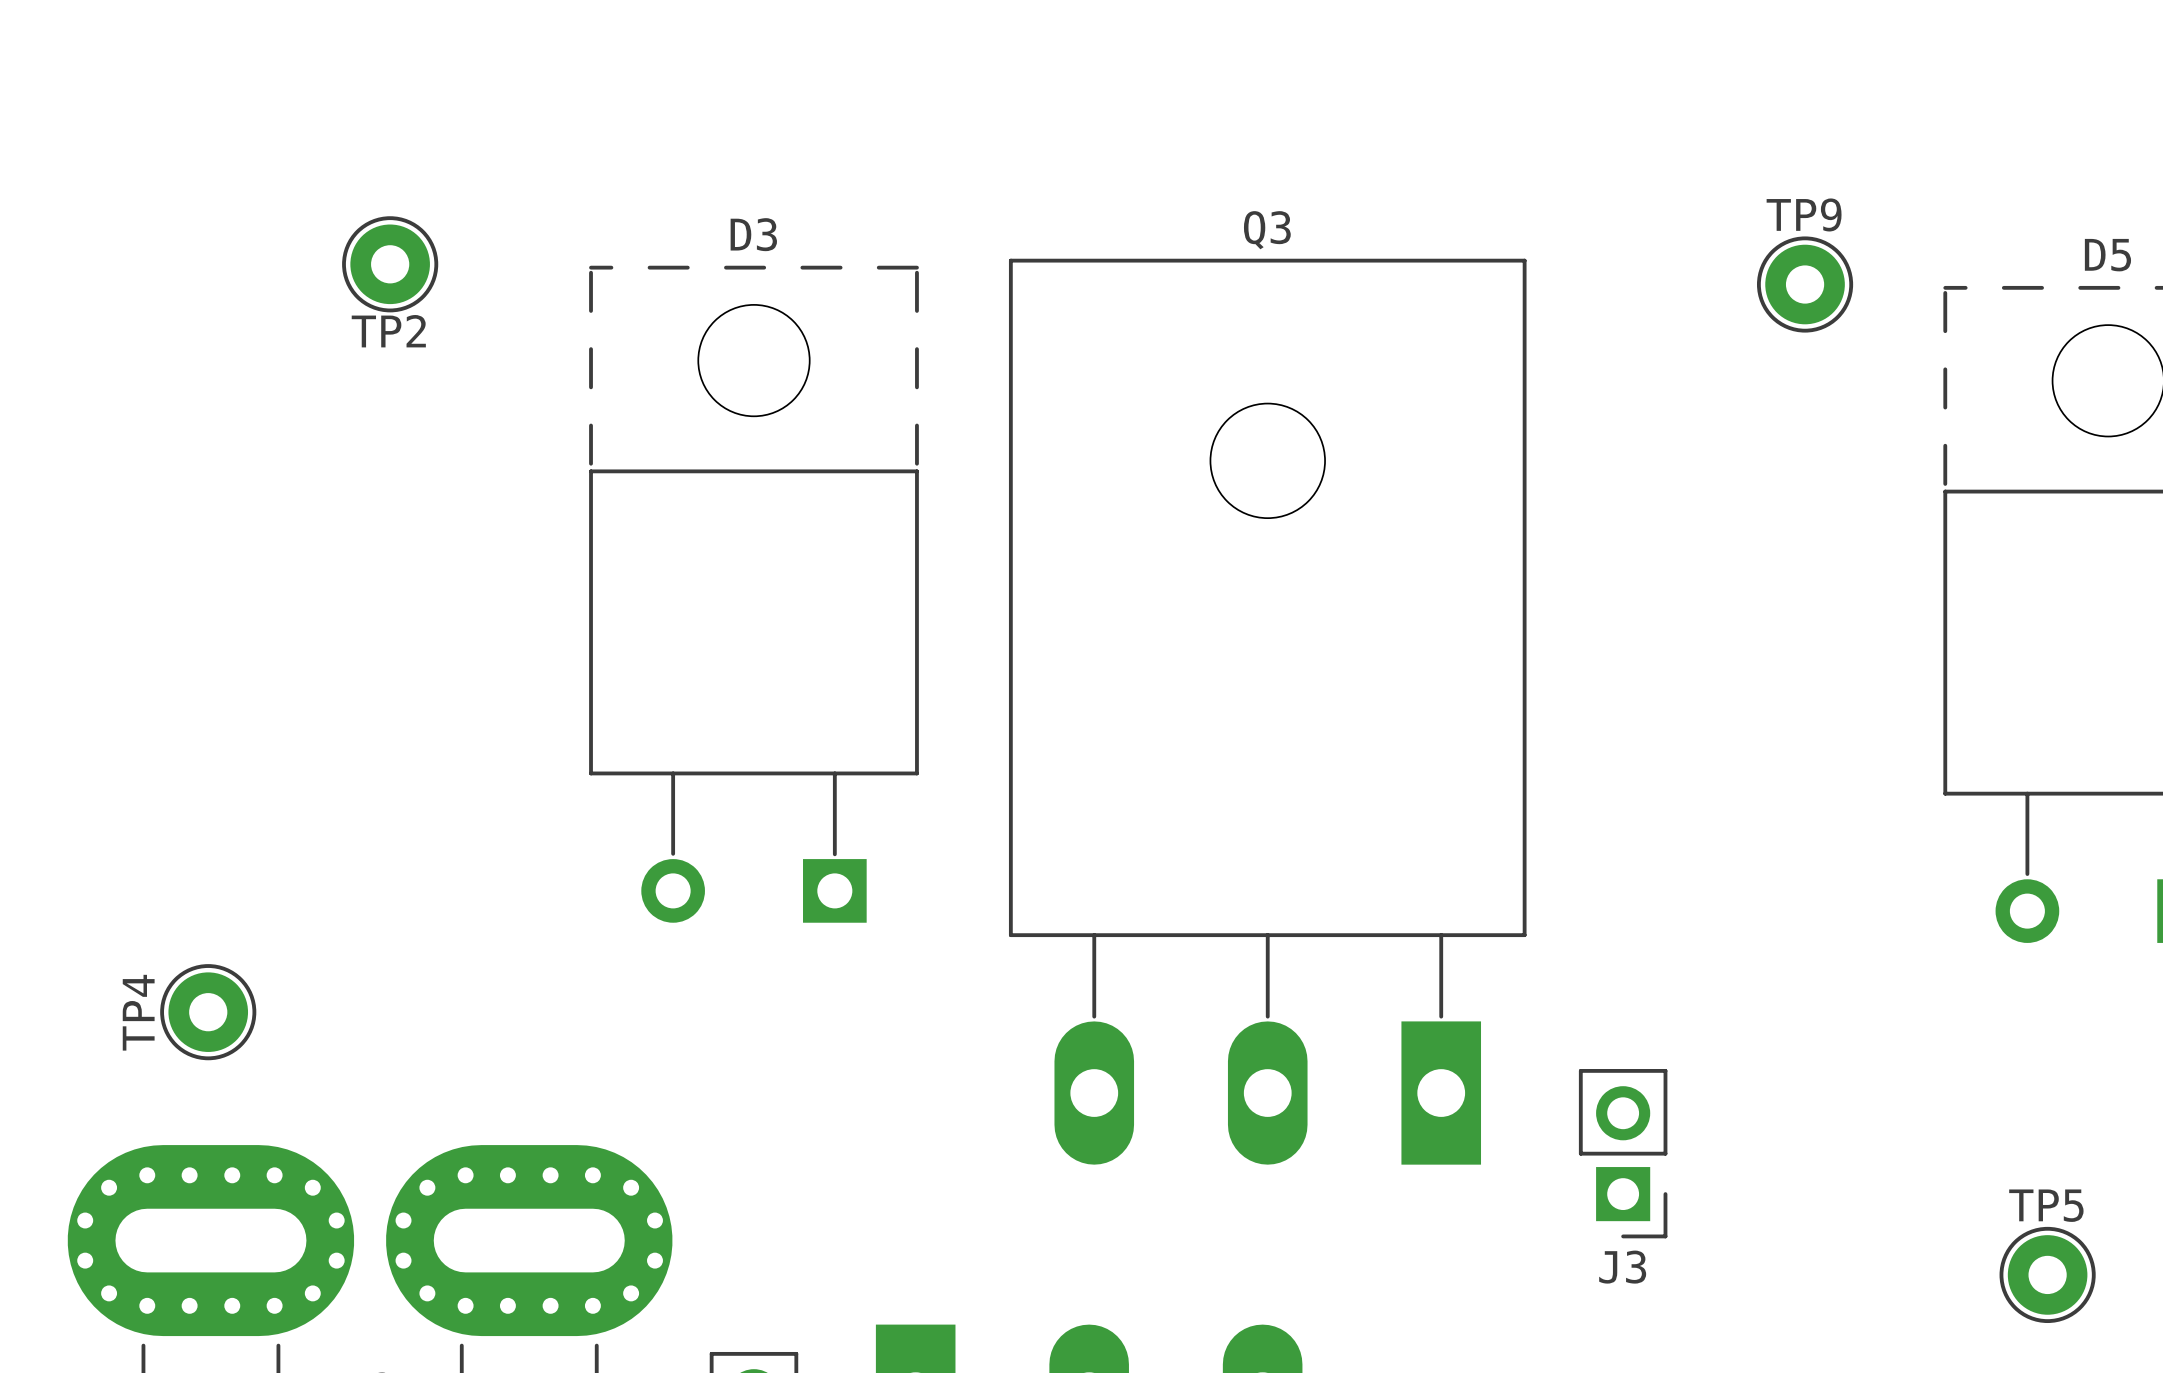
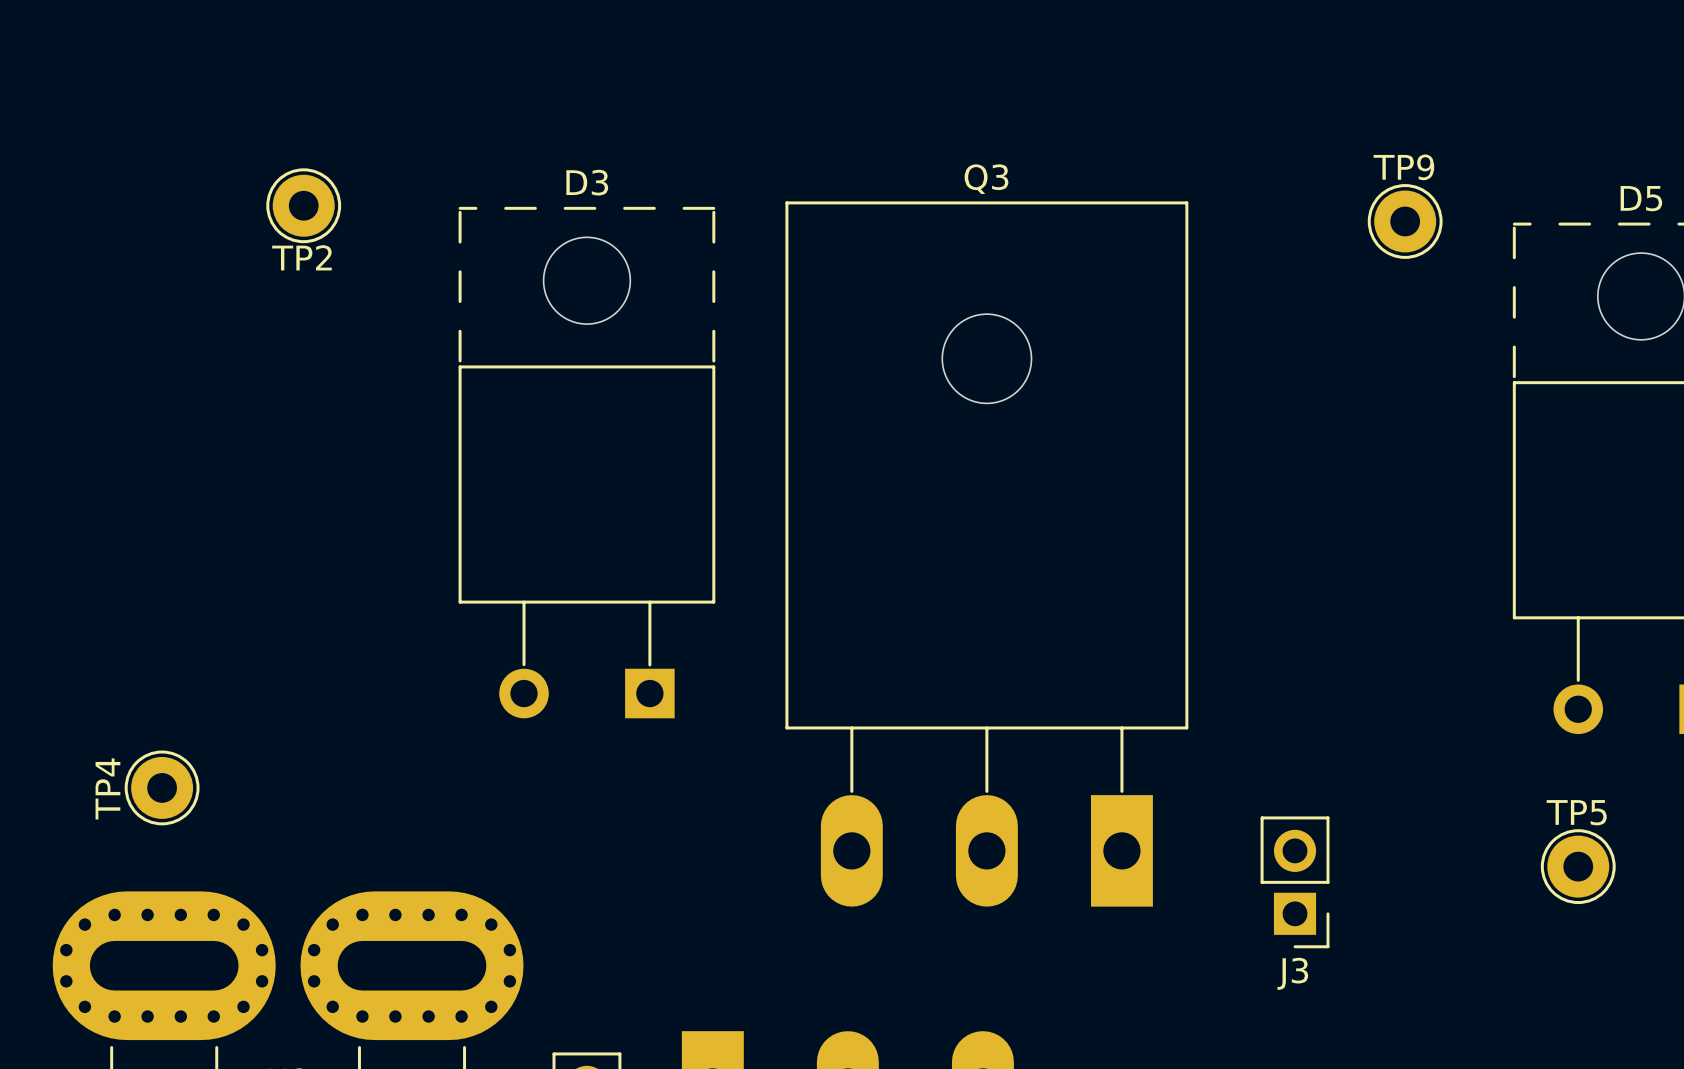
J3 position: (1623, 1153) -> (1295, 882)
TP5 position: (2047, 1274) -> (1578, 866)

